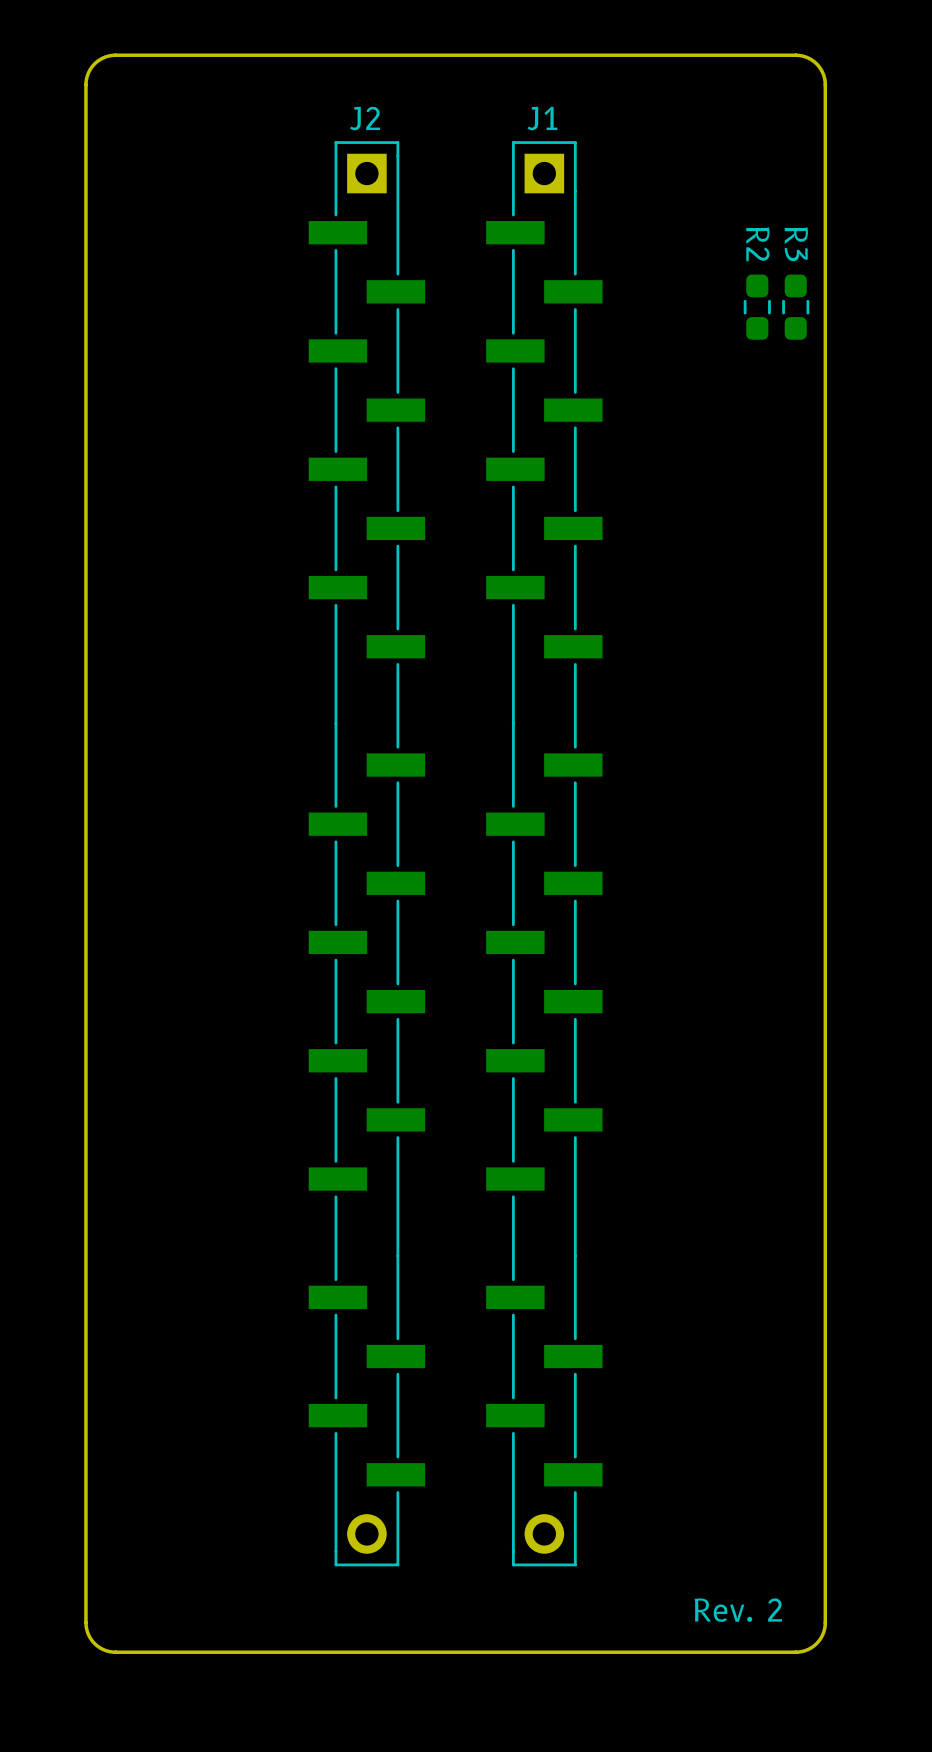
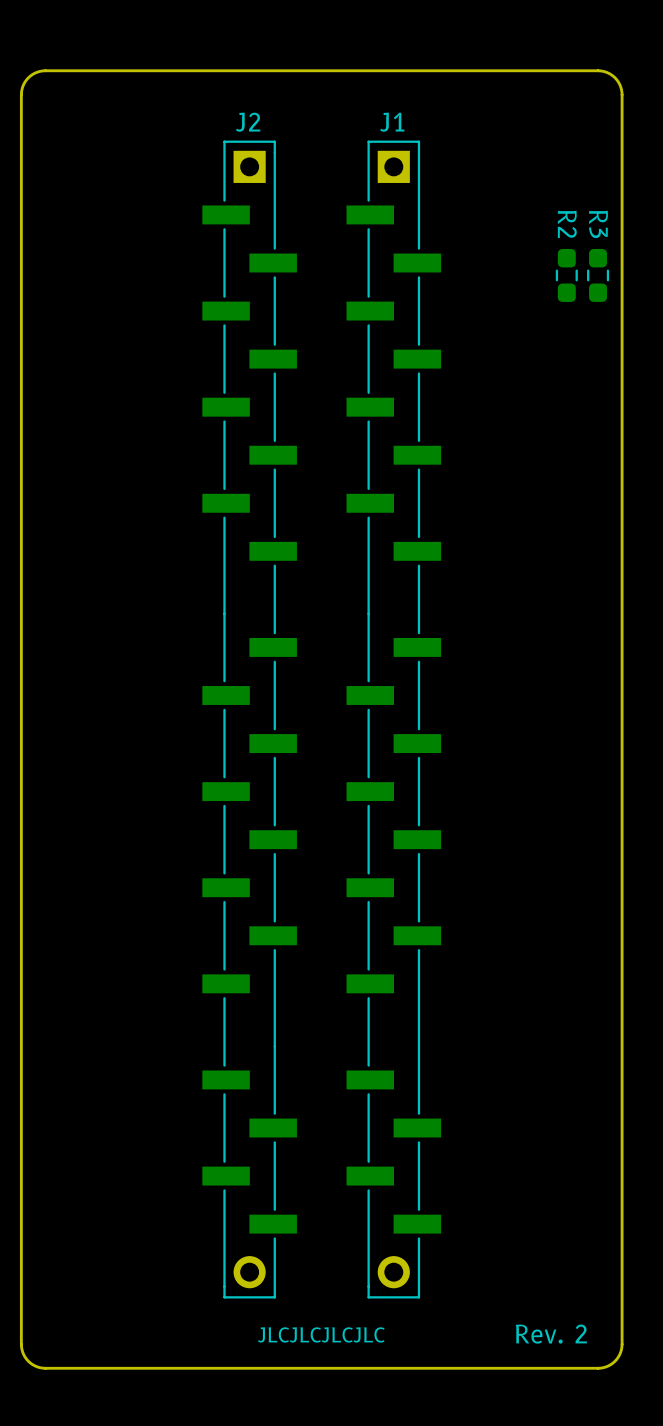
text: none -> JLCJLCJLCJLC (321, 1334)

